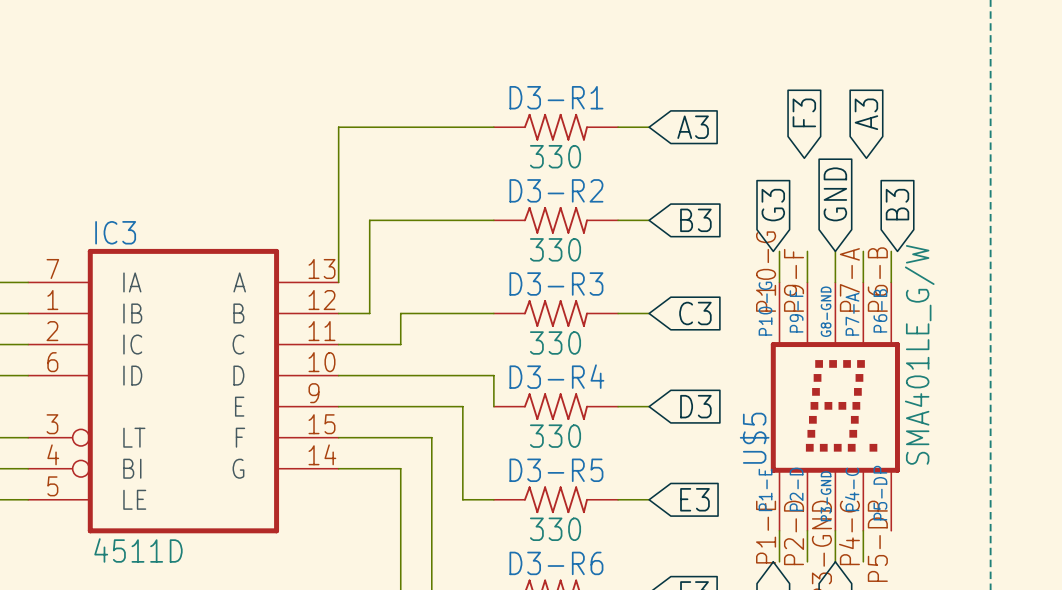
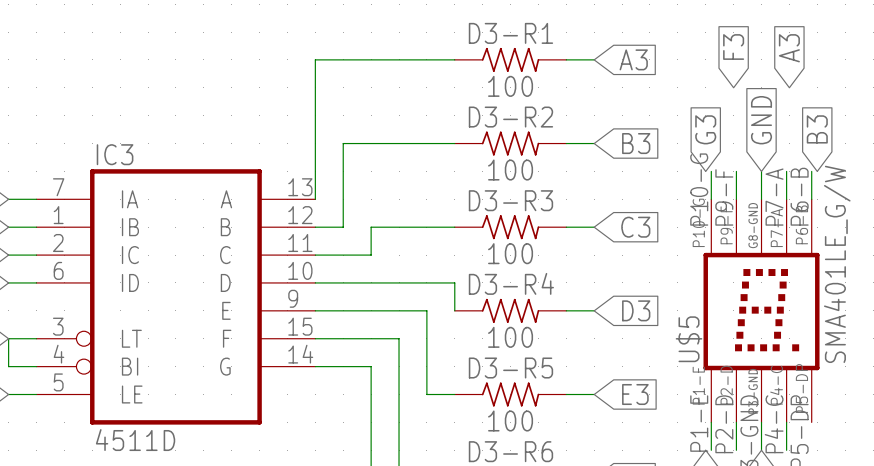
D3-R1 value: 330 (555, 156) -> 100 (510, 86)
D3-R2 value: 330 (555, 249) -> 100 (510, 170)
D3-R3 value: 330 (555, 342) -> 100 (510, 253)
D3-R4 value: 330 (555, 436) -> 100 (510, 337)
D3-R5 value: 330 (555, 529) -> 100 (510, 420)

